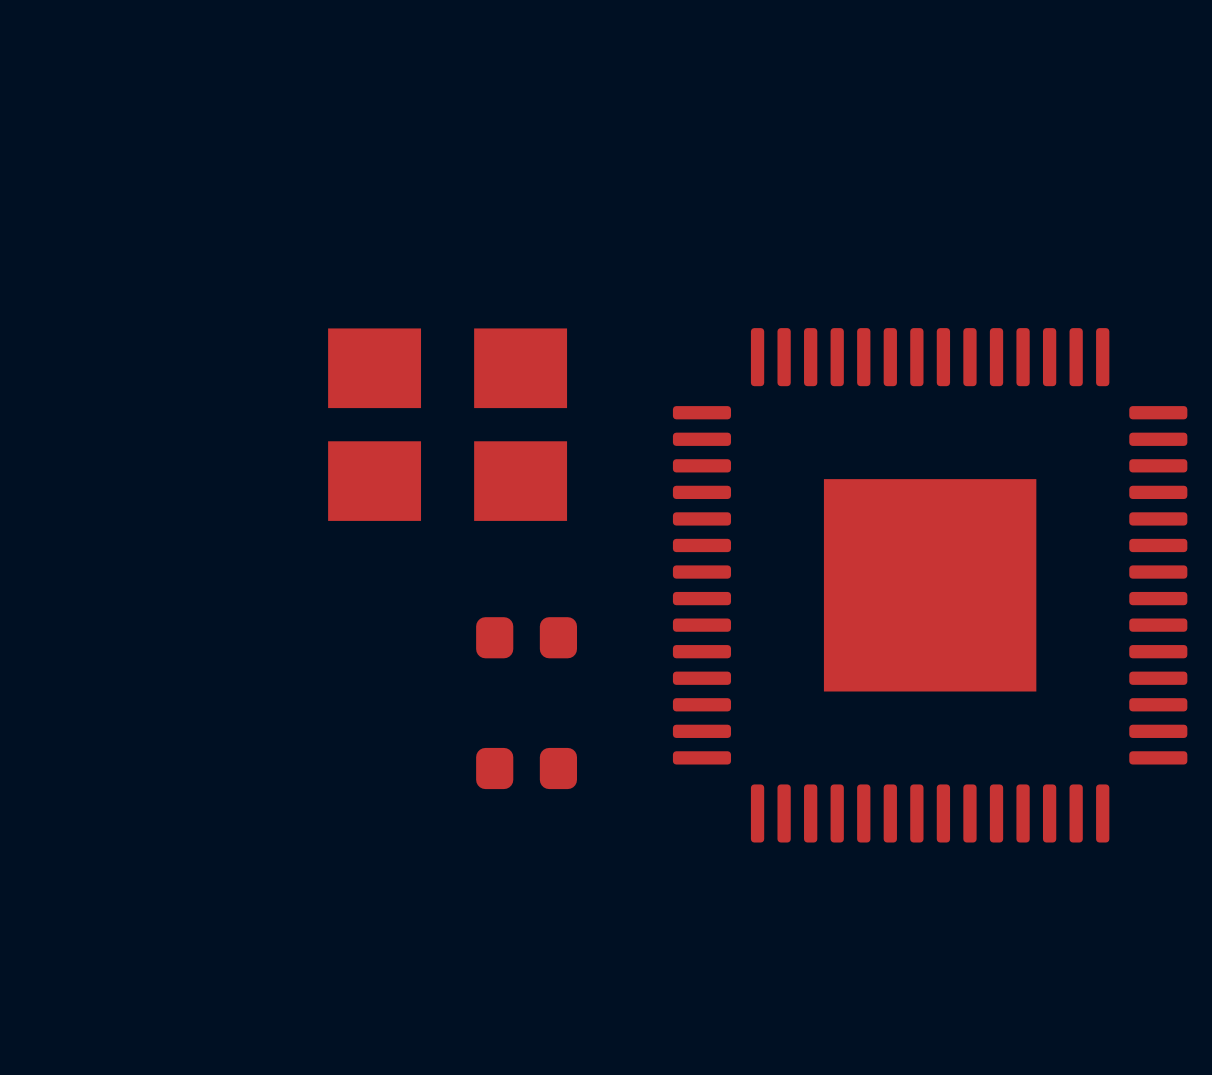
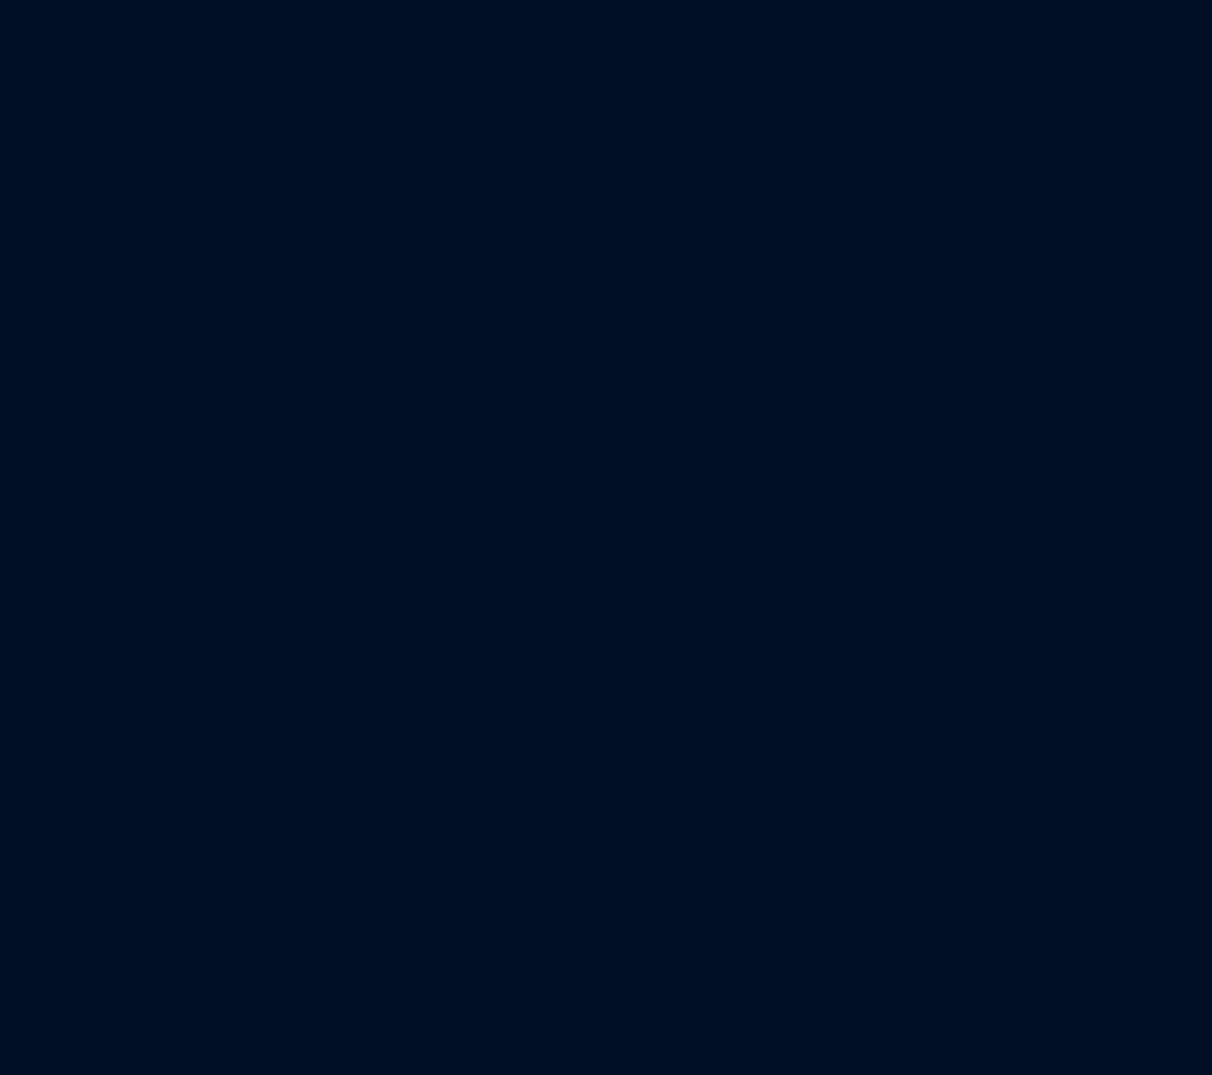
part: (447, 424) -> none
part: (930, 585) -> none
part: (526, 637) -> none
part: (526, 768) -> none

